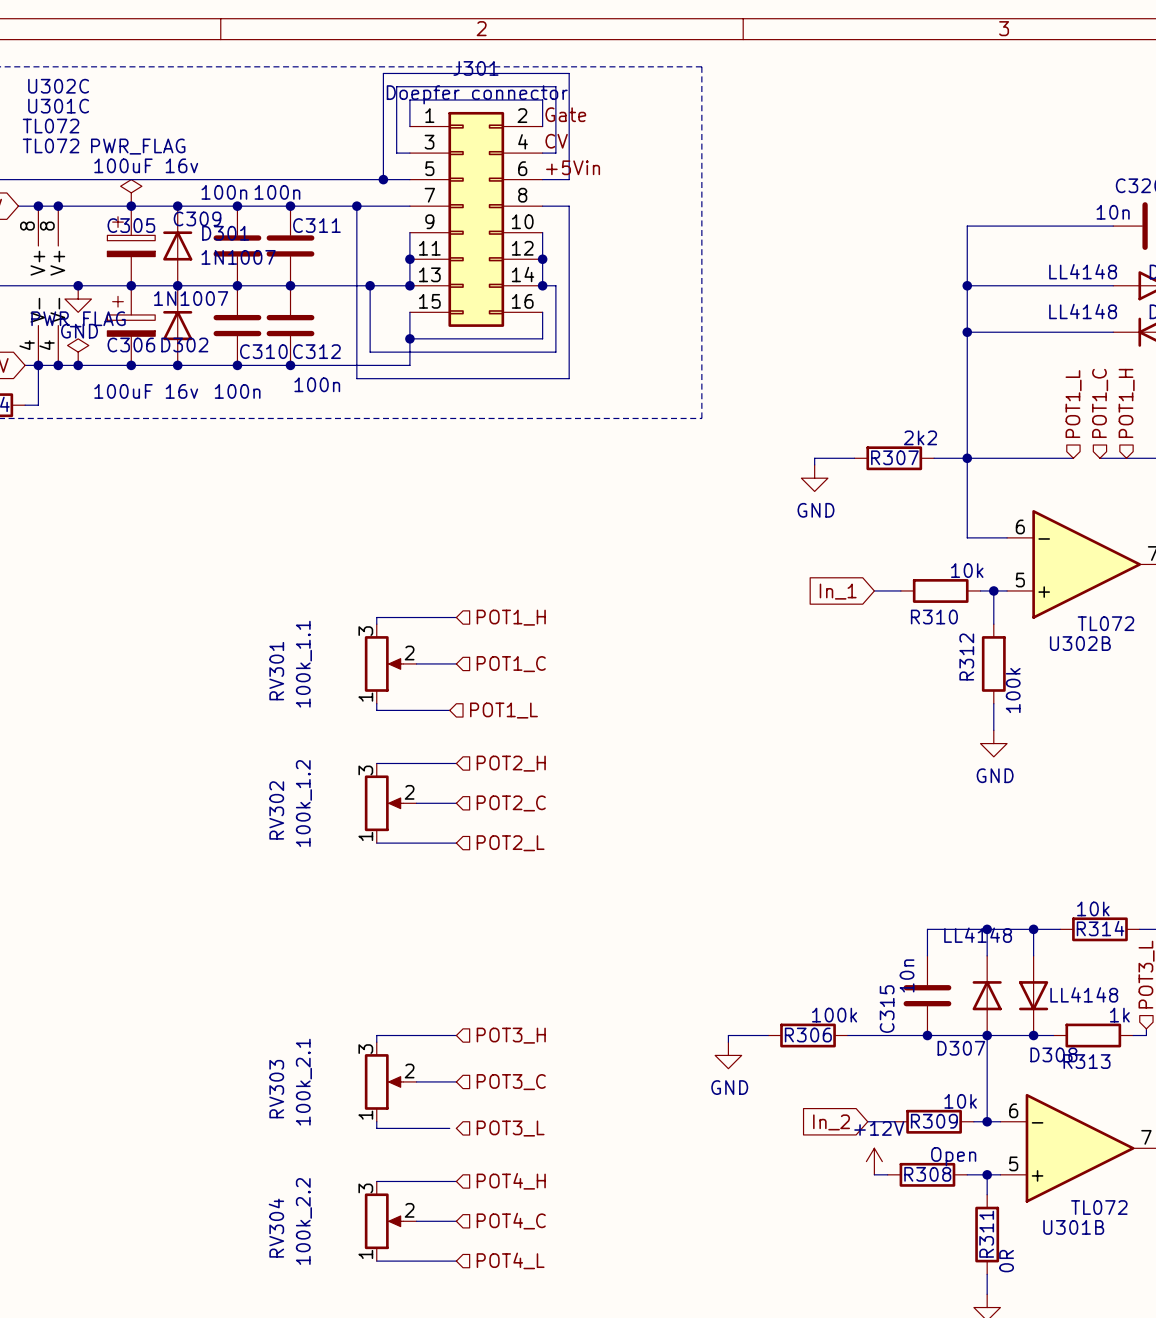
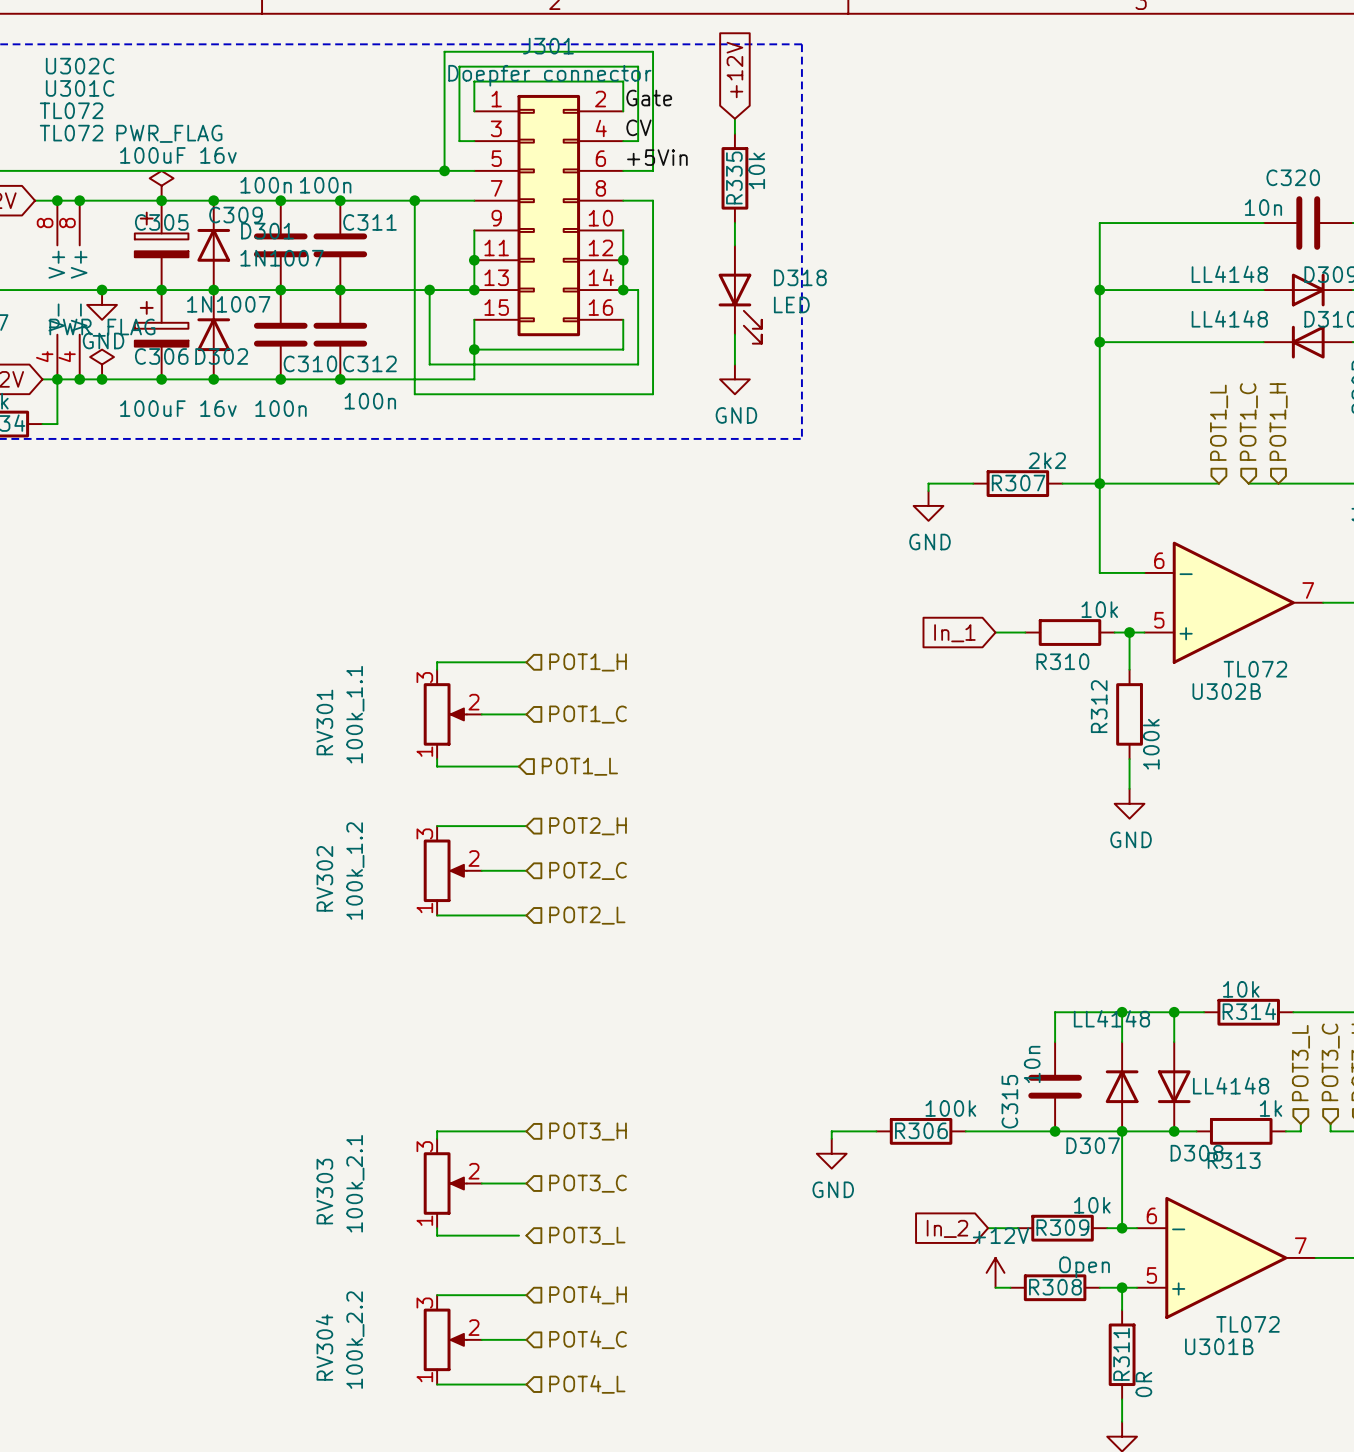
global label: none -> +12V (734, 70)
wire: none -> (734, 118) (734, 133)
R335: none -> 10k (734, 178)
wire: none -> (734, 223) (734, 245)
D318: none -> LED (740, 294)
wire: none -> (734, 334) (734, 364)
power symbol: none -> GND (734, 379)

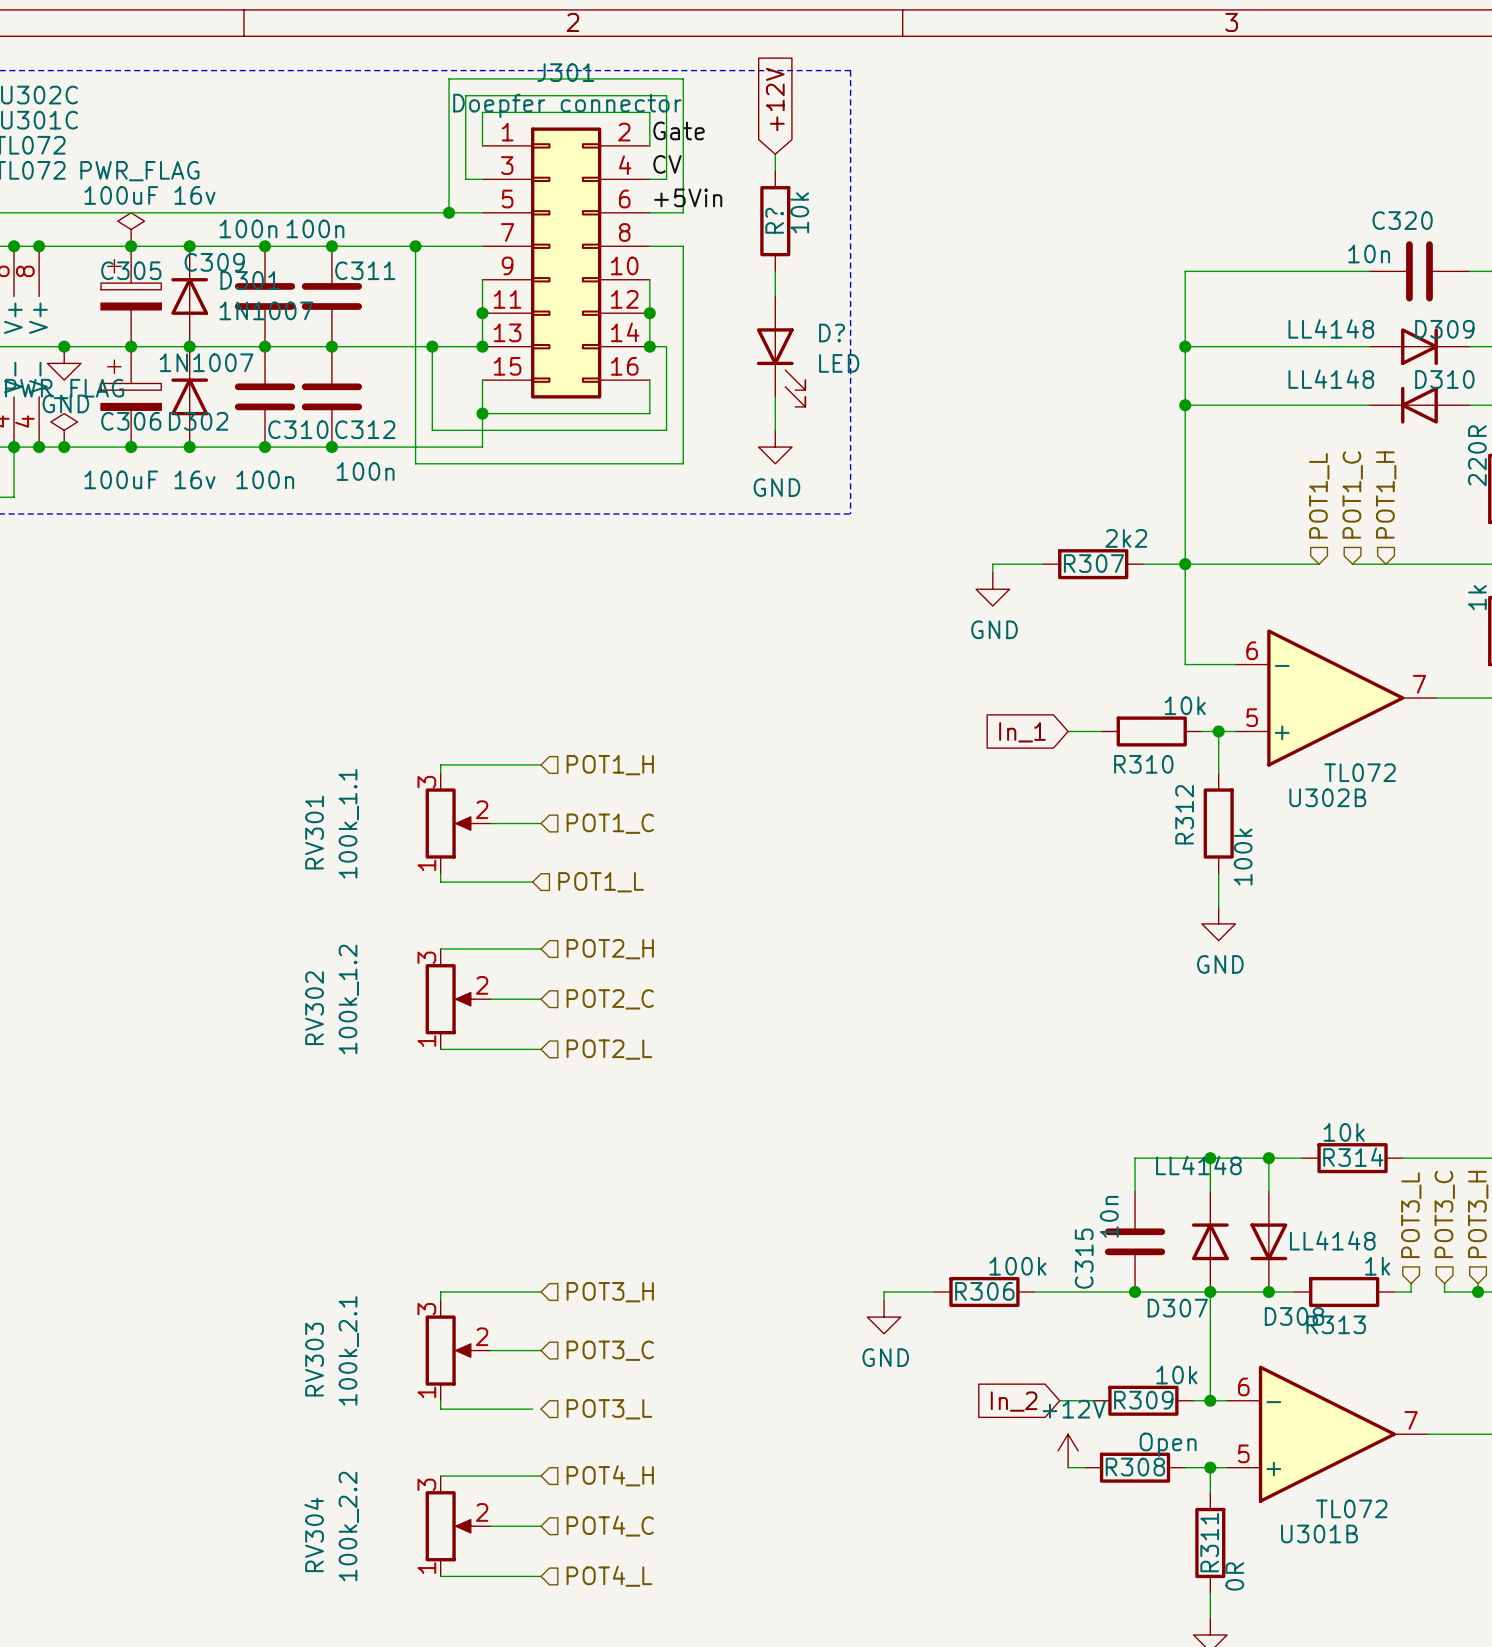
R335 name: R335 (734, 177) -> R? (774, 220)
D318 name: D318 (800, 277) -> D? (832, 332)

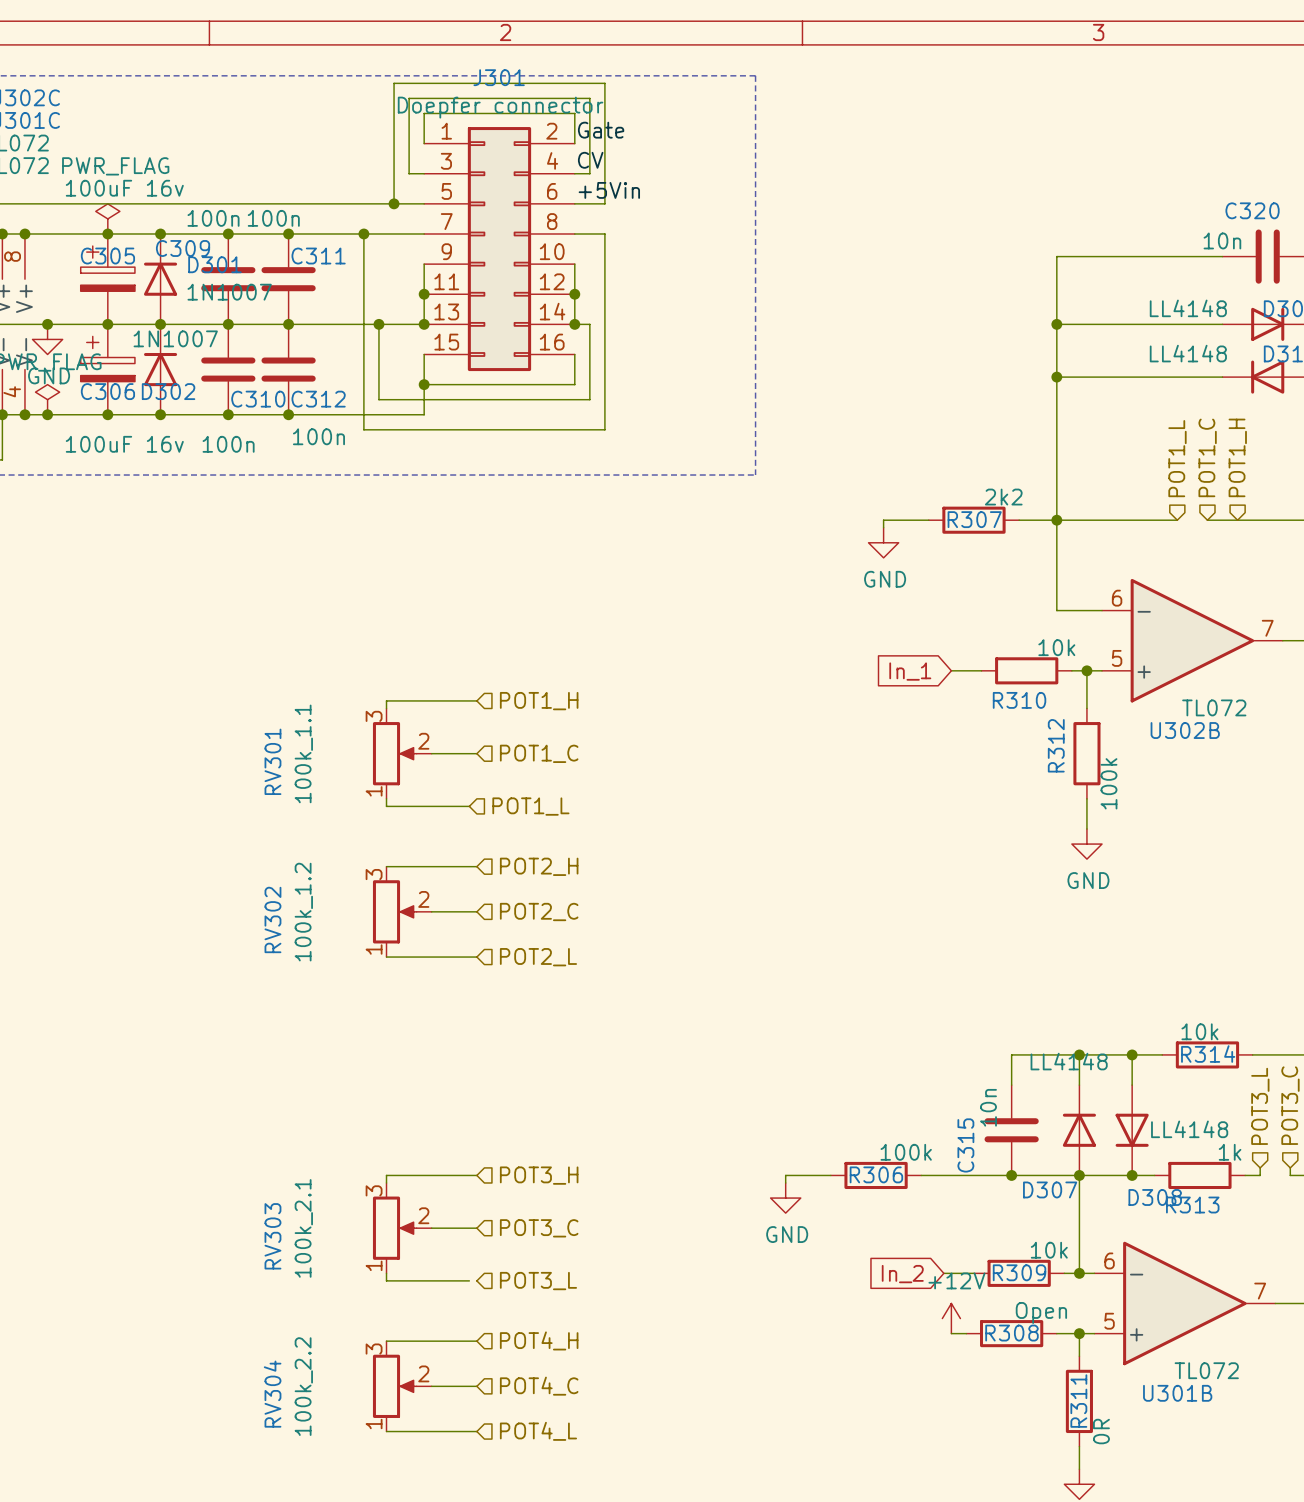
global label: +12V (775, 99) -> none
wire: (775, 154) (775, 170) -> none
R?: 10k (775, 221) -> none
wire: (775, 271) (775, 296) -> none
D?: LED (781, 351) -> none
wire: (775, 396) (775, 430) -> none
power symbol: GND (775, 447) -> none

